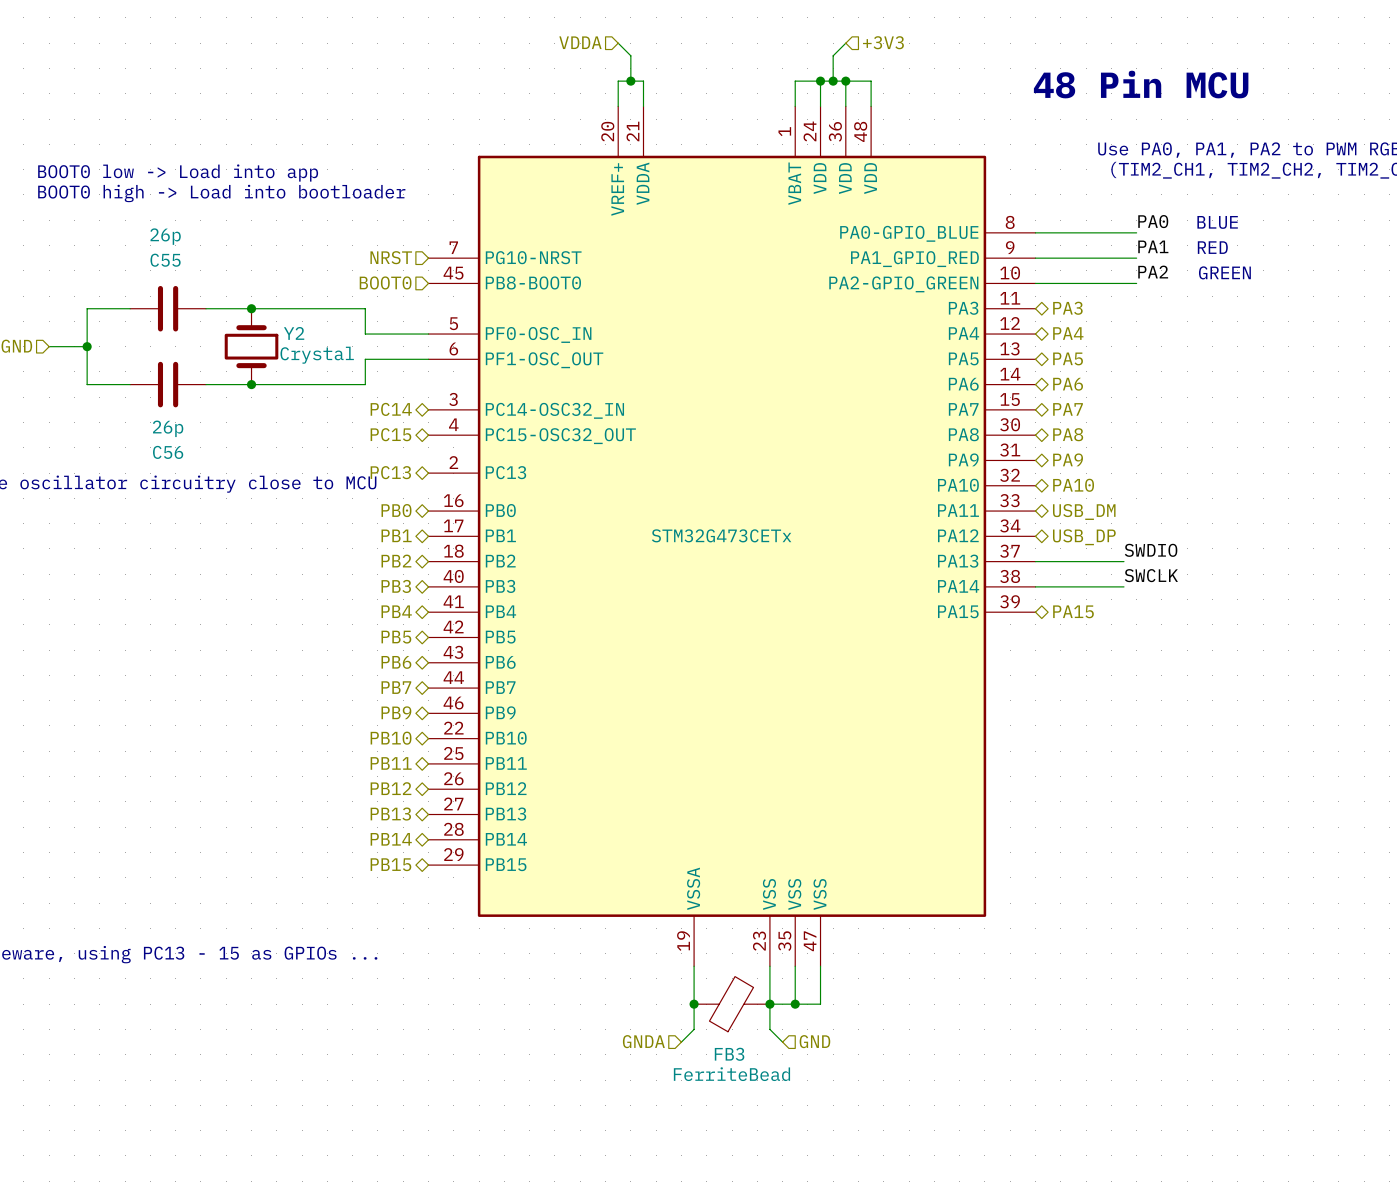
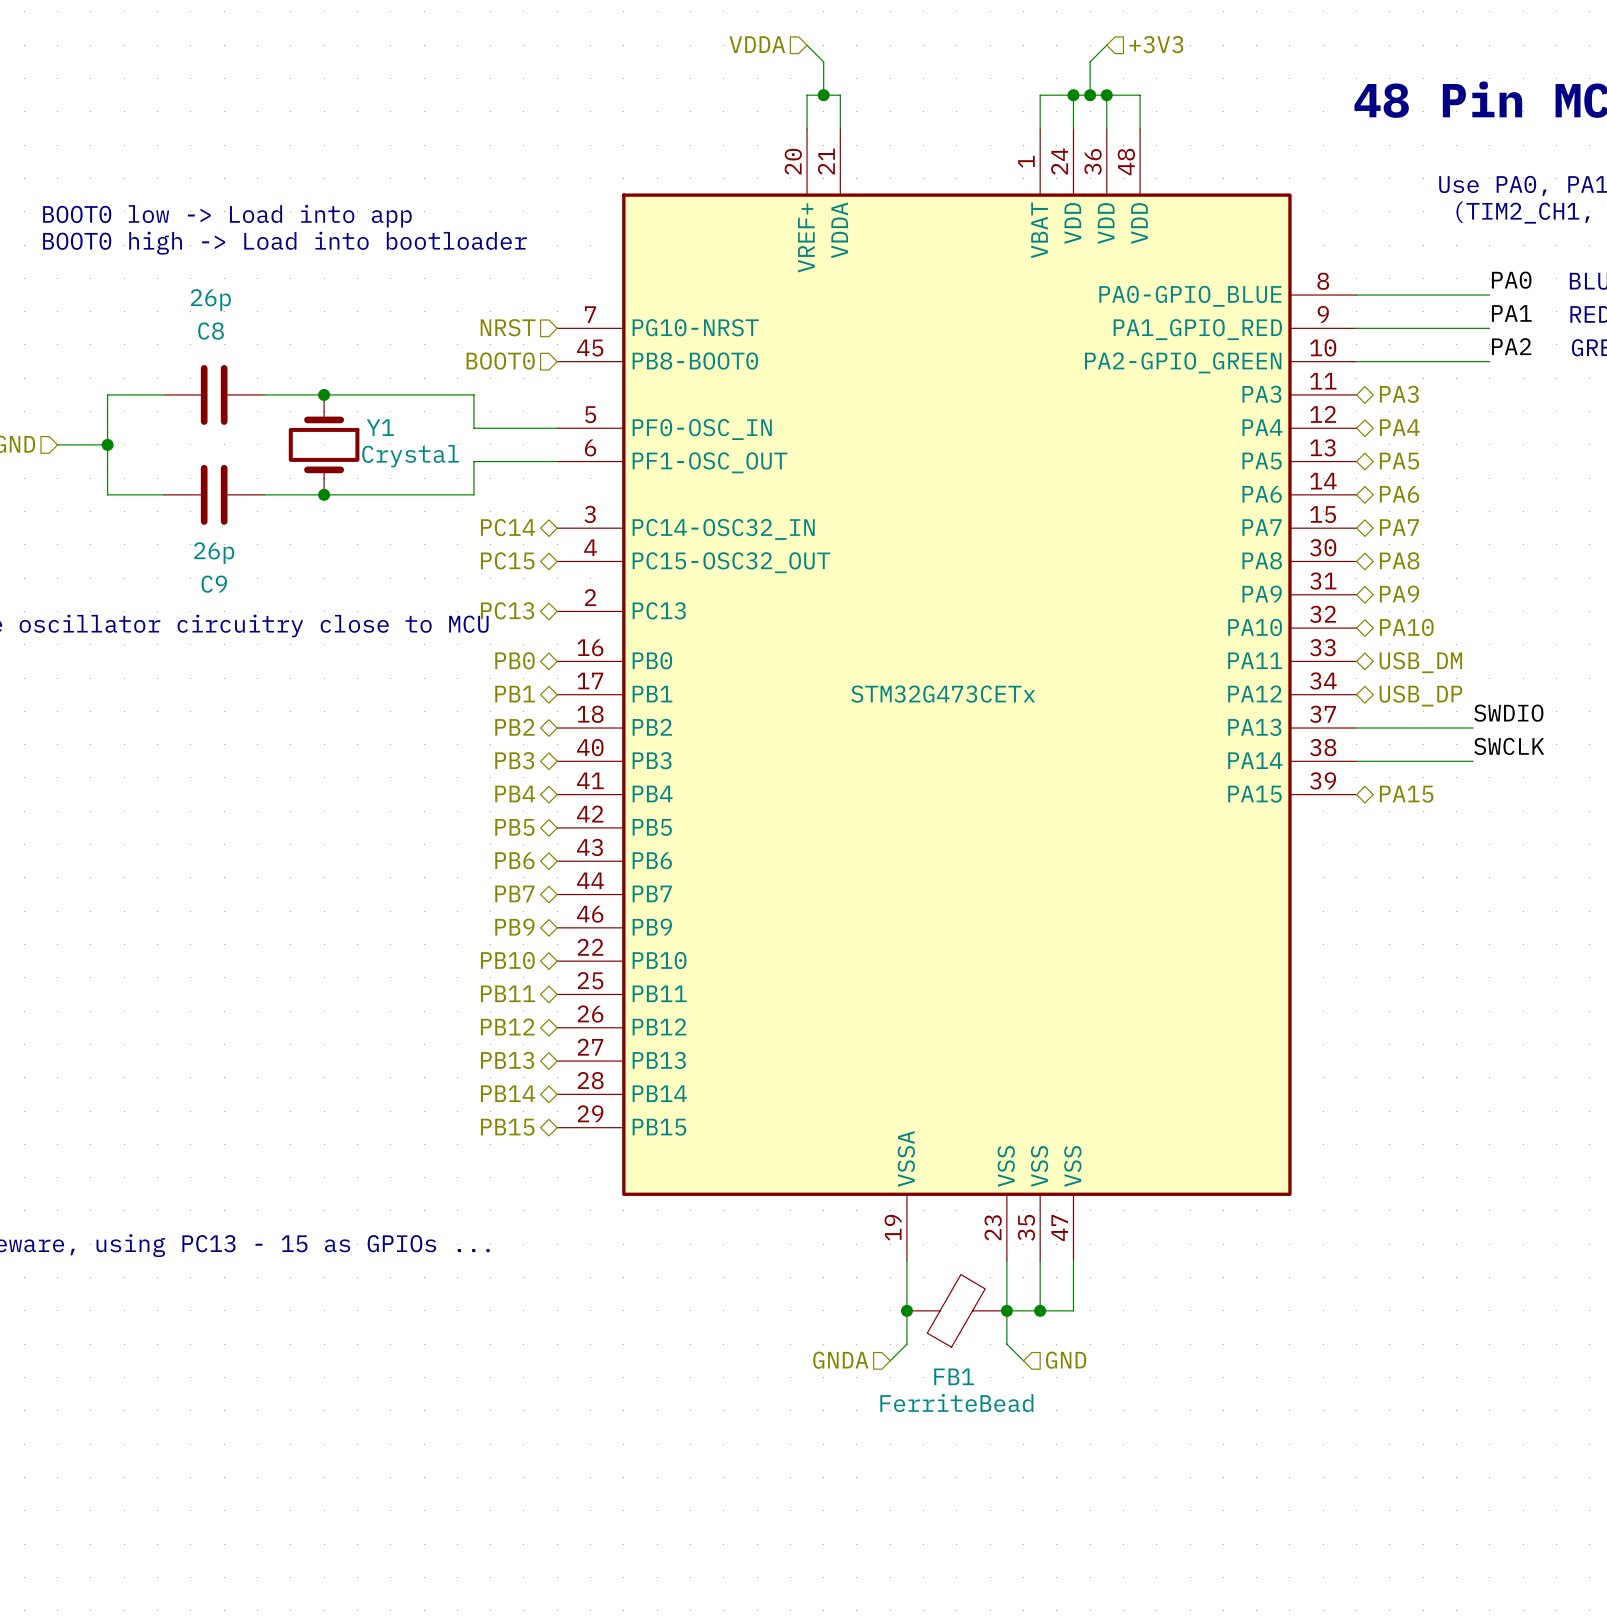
C55 name: C55 (165, 260) -> C8 (211, 331)
Y2 name: Y2 (294, 333) -> Y1 (380, 427)
C56 name: C56 (168, 452) -> C9 (214, 584)
FB3 name: FB3 (729, 1054) -> FB1 (954, 1376)

